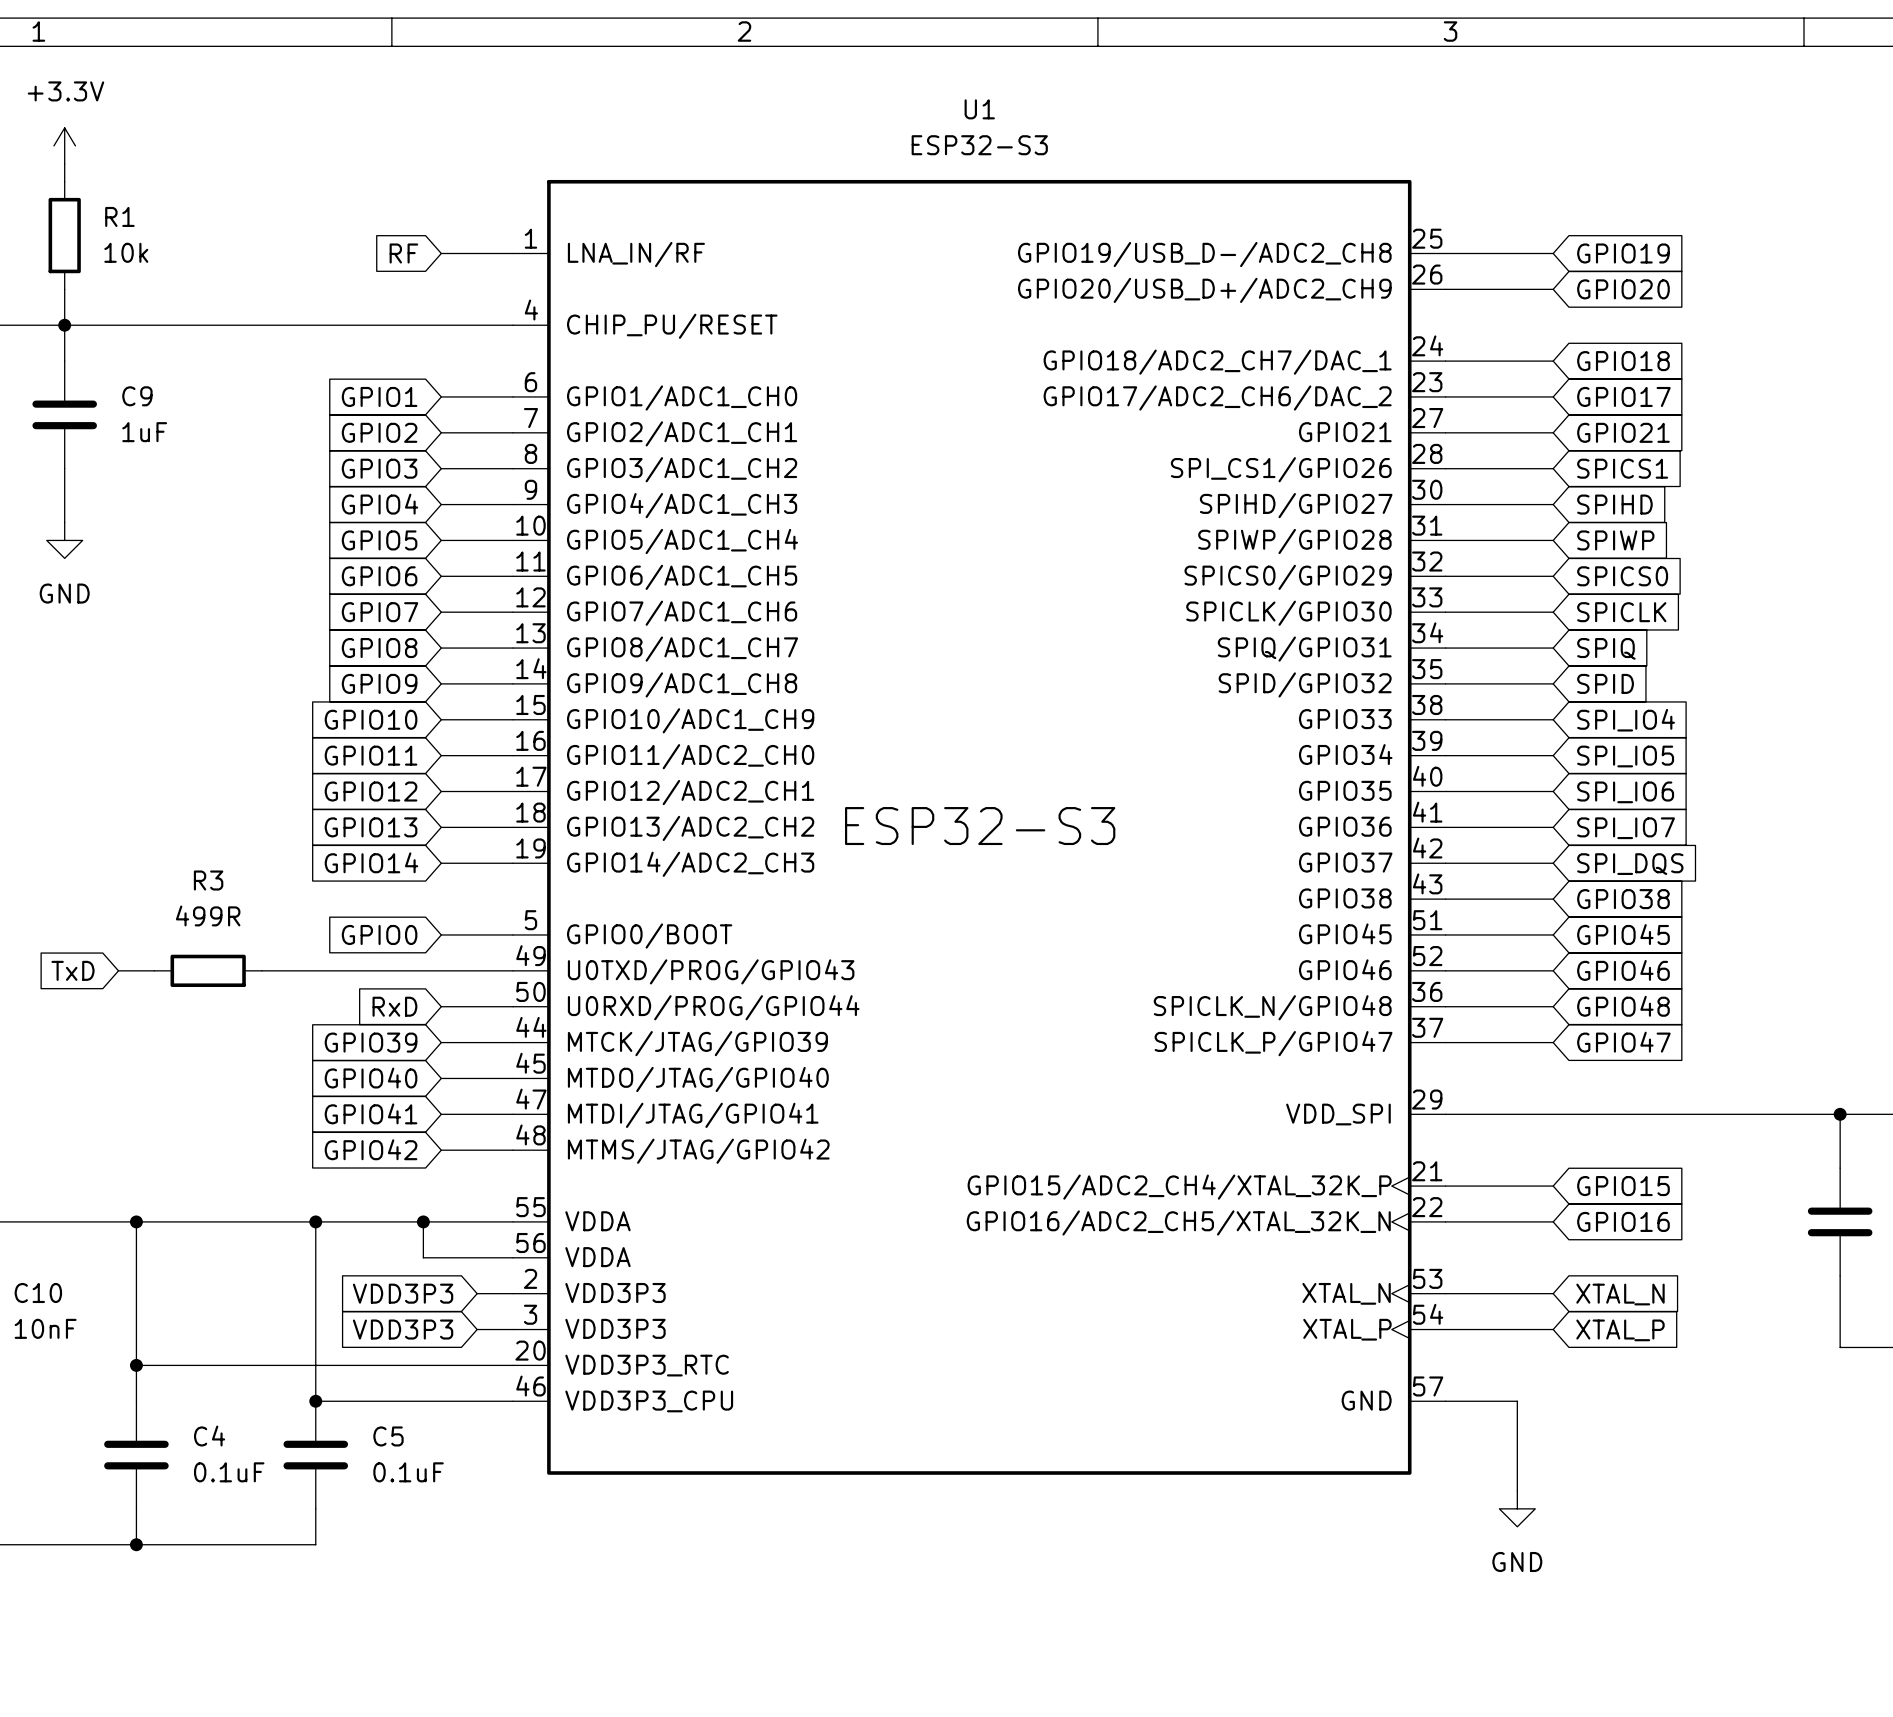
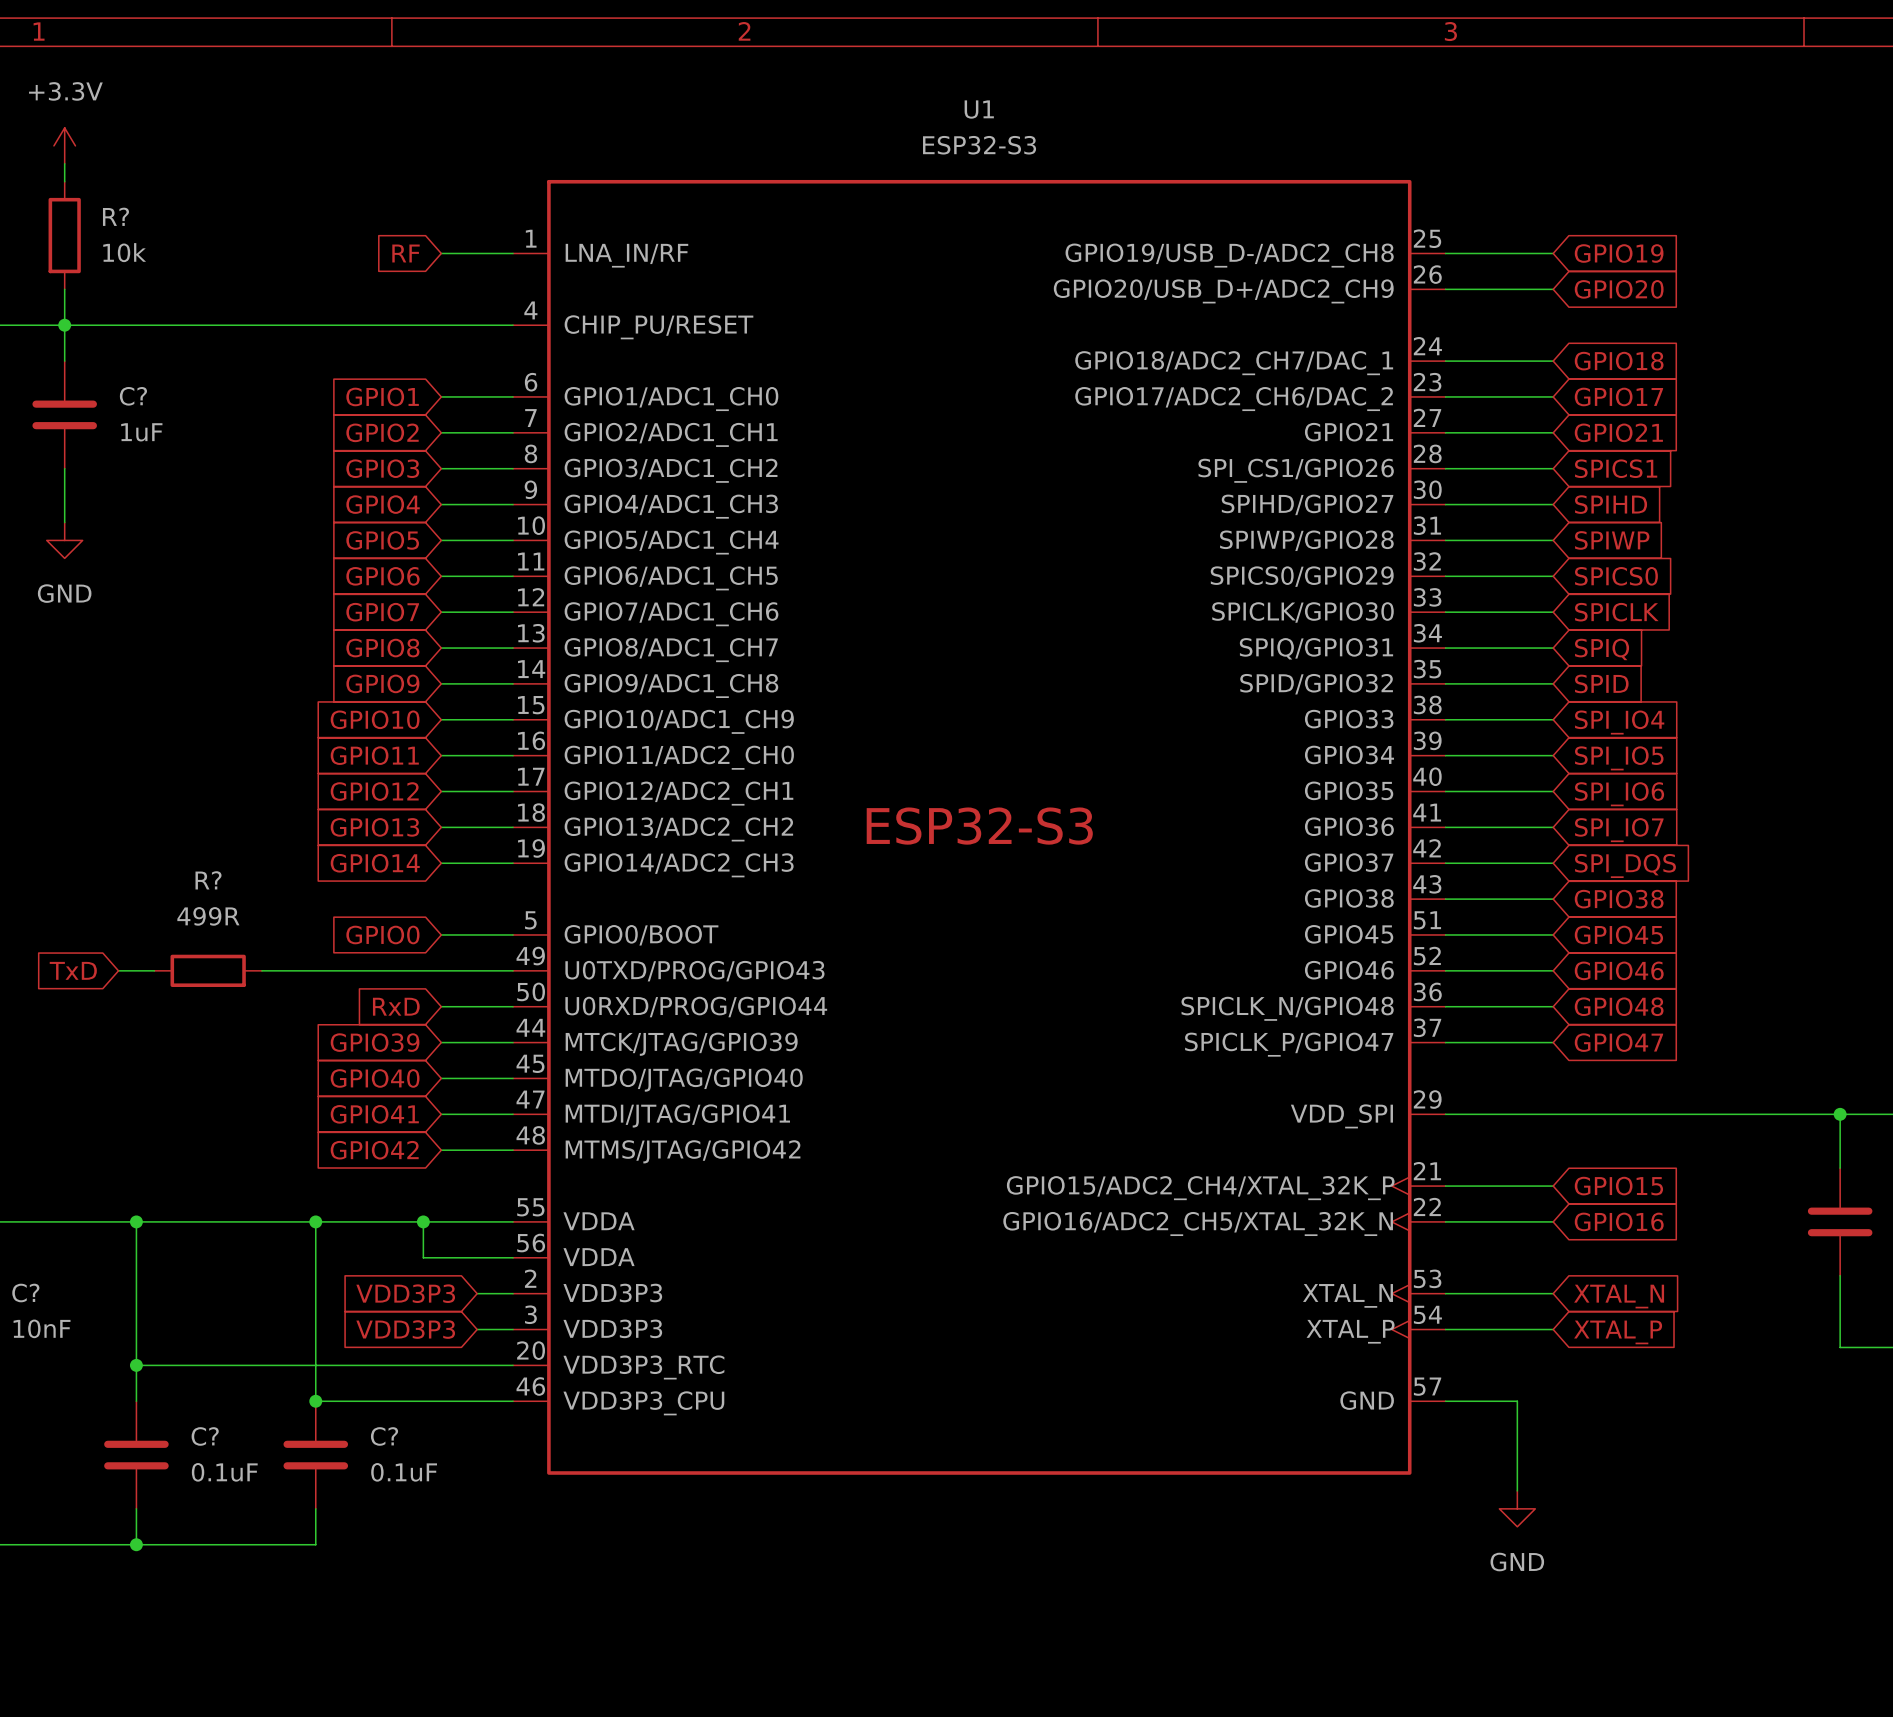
R1 name: R1 (119, 216) -> R? (115, 216)
C9 name: C9 (137, 396) -> C? (133, 396)
R3 name: R3 (208, 880) -> R? (208, 880)
C10 name: C10 (38, 1292) -> C? (25, 1293)
C4 name: C4 (209, 1436) -> C? (205, 1436)
C5 name: C5 (388, 1436) -> C? (384, 1436)

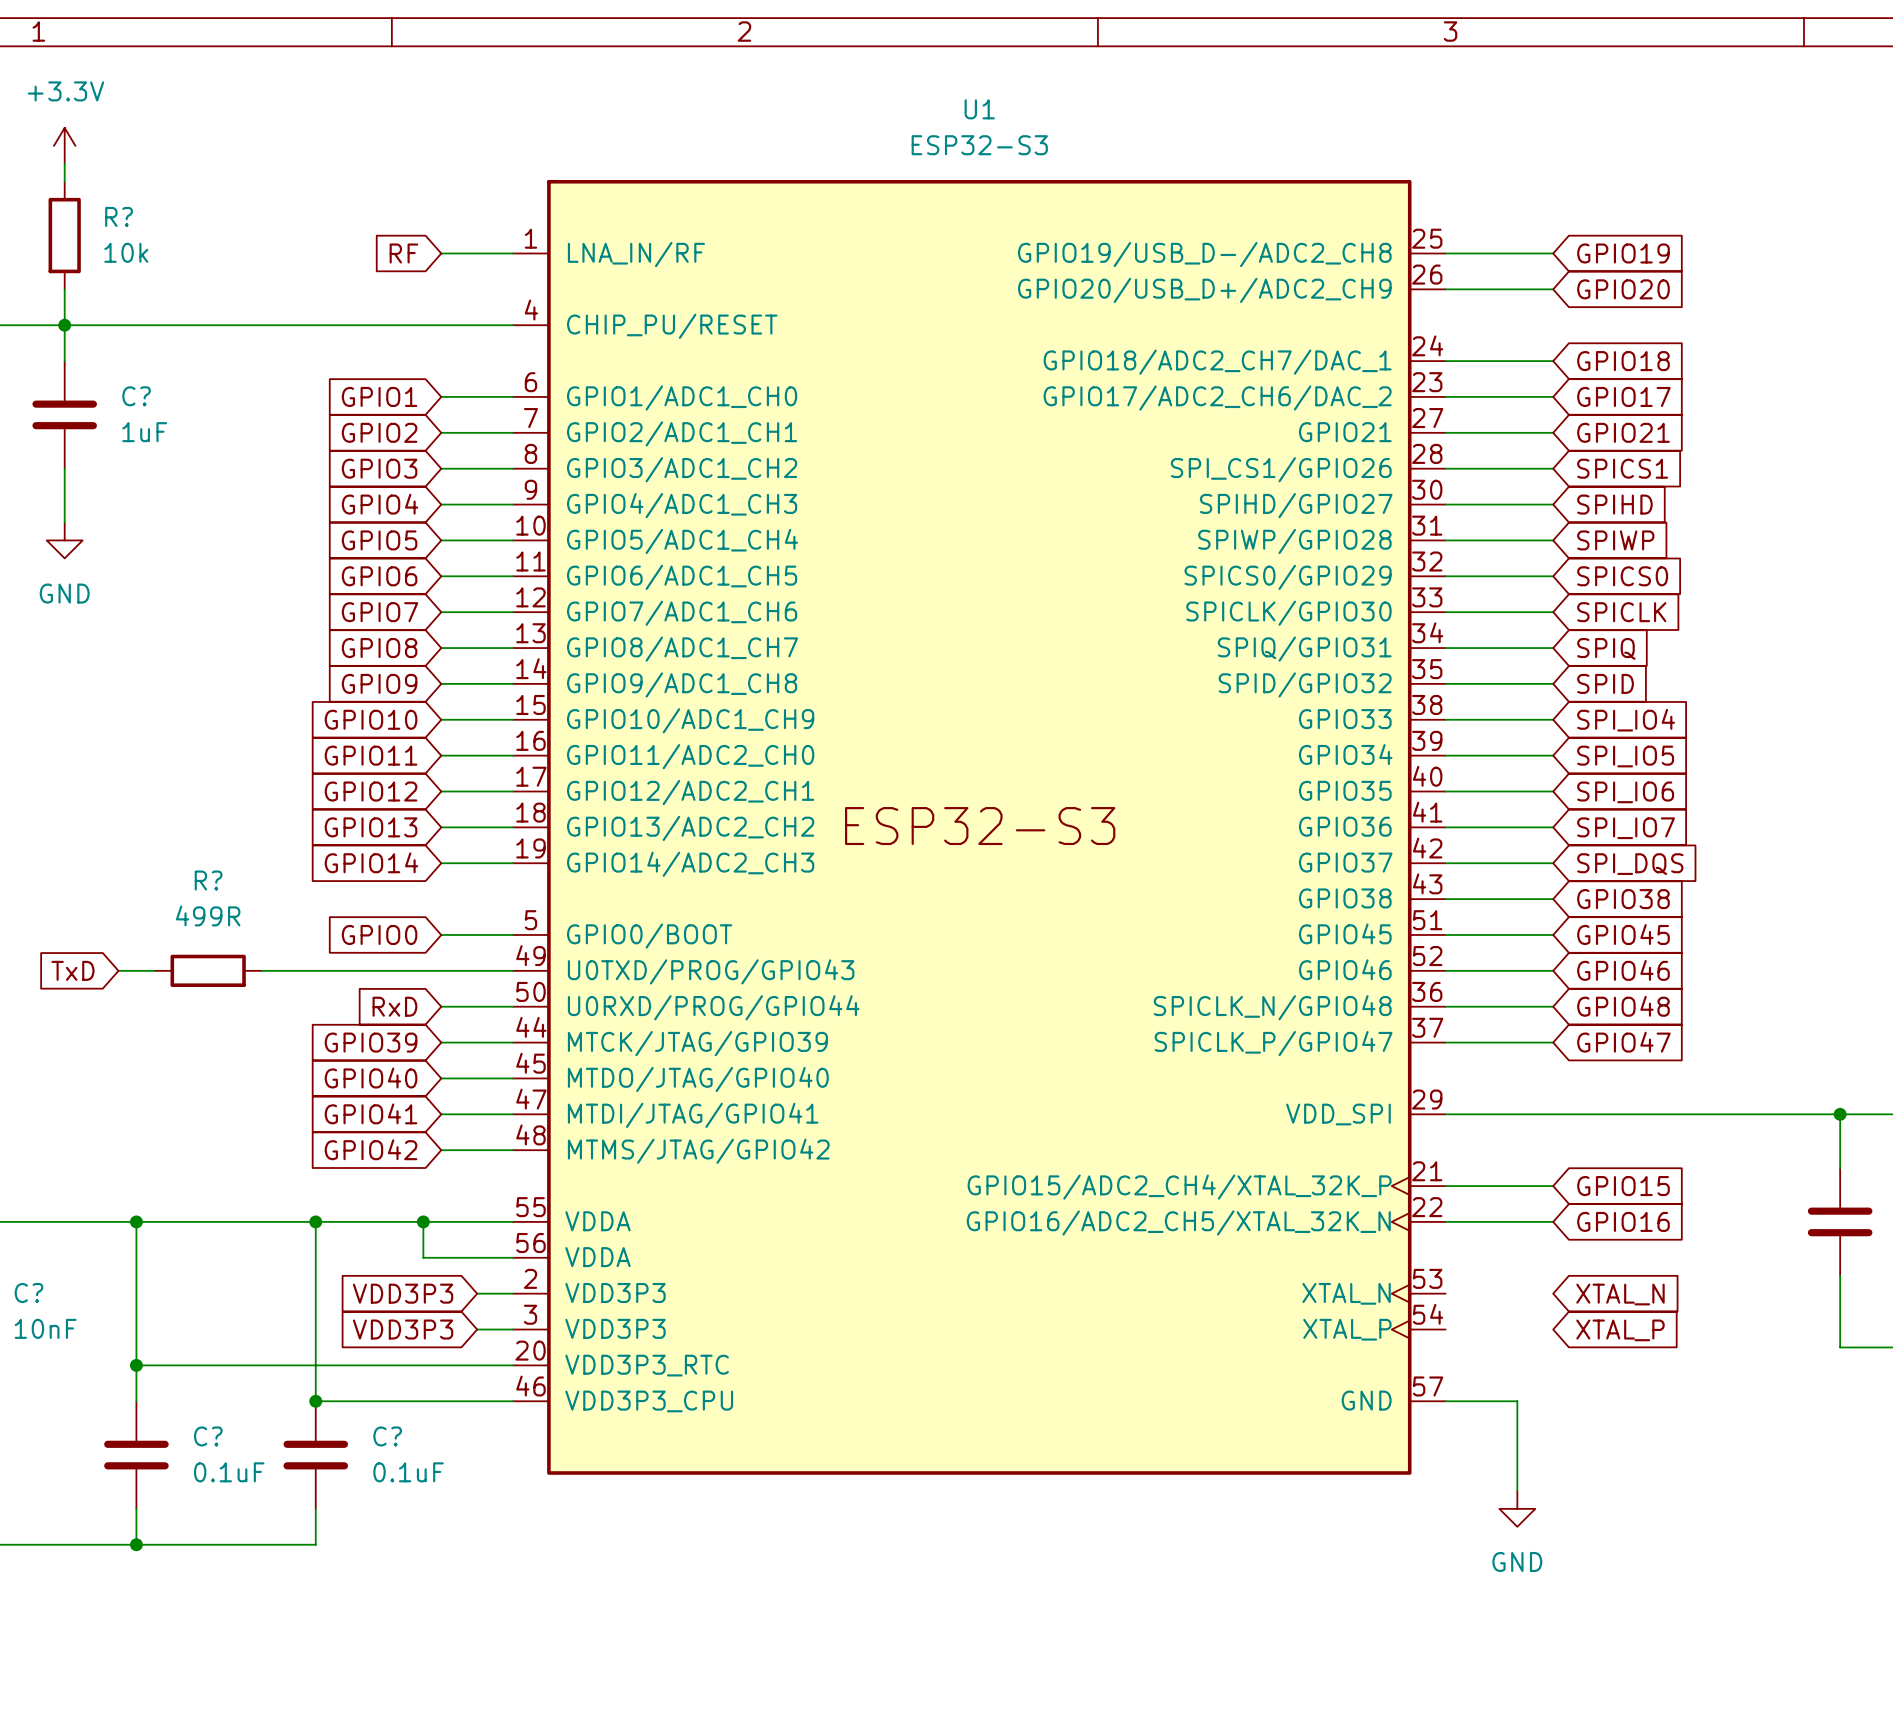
wire: (1445, 1293) (1553, 1293) -> none
wire: (1445, 1329) (1553, 1329) -> none

